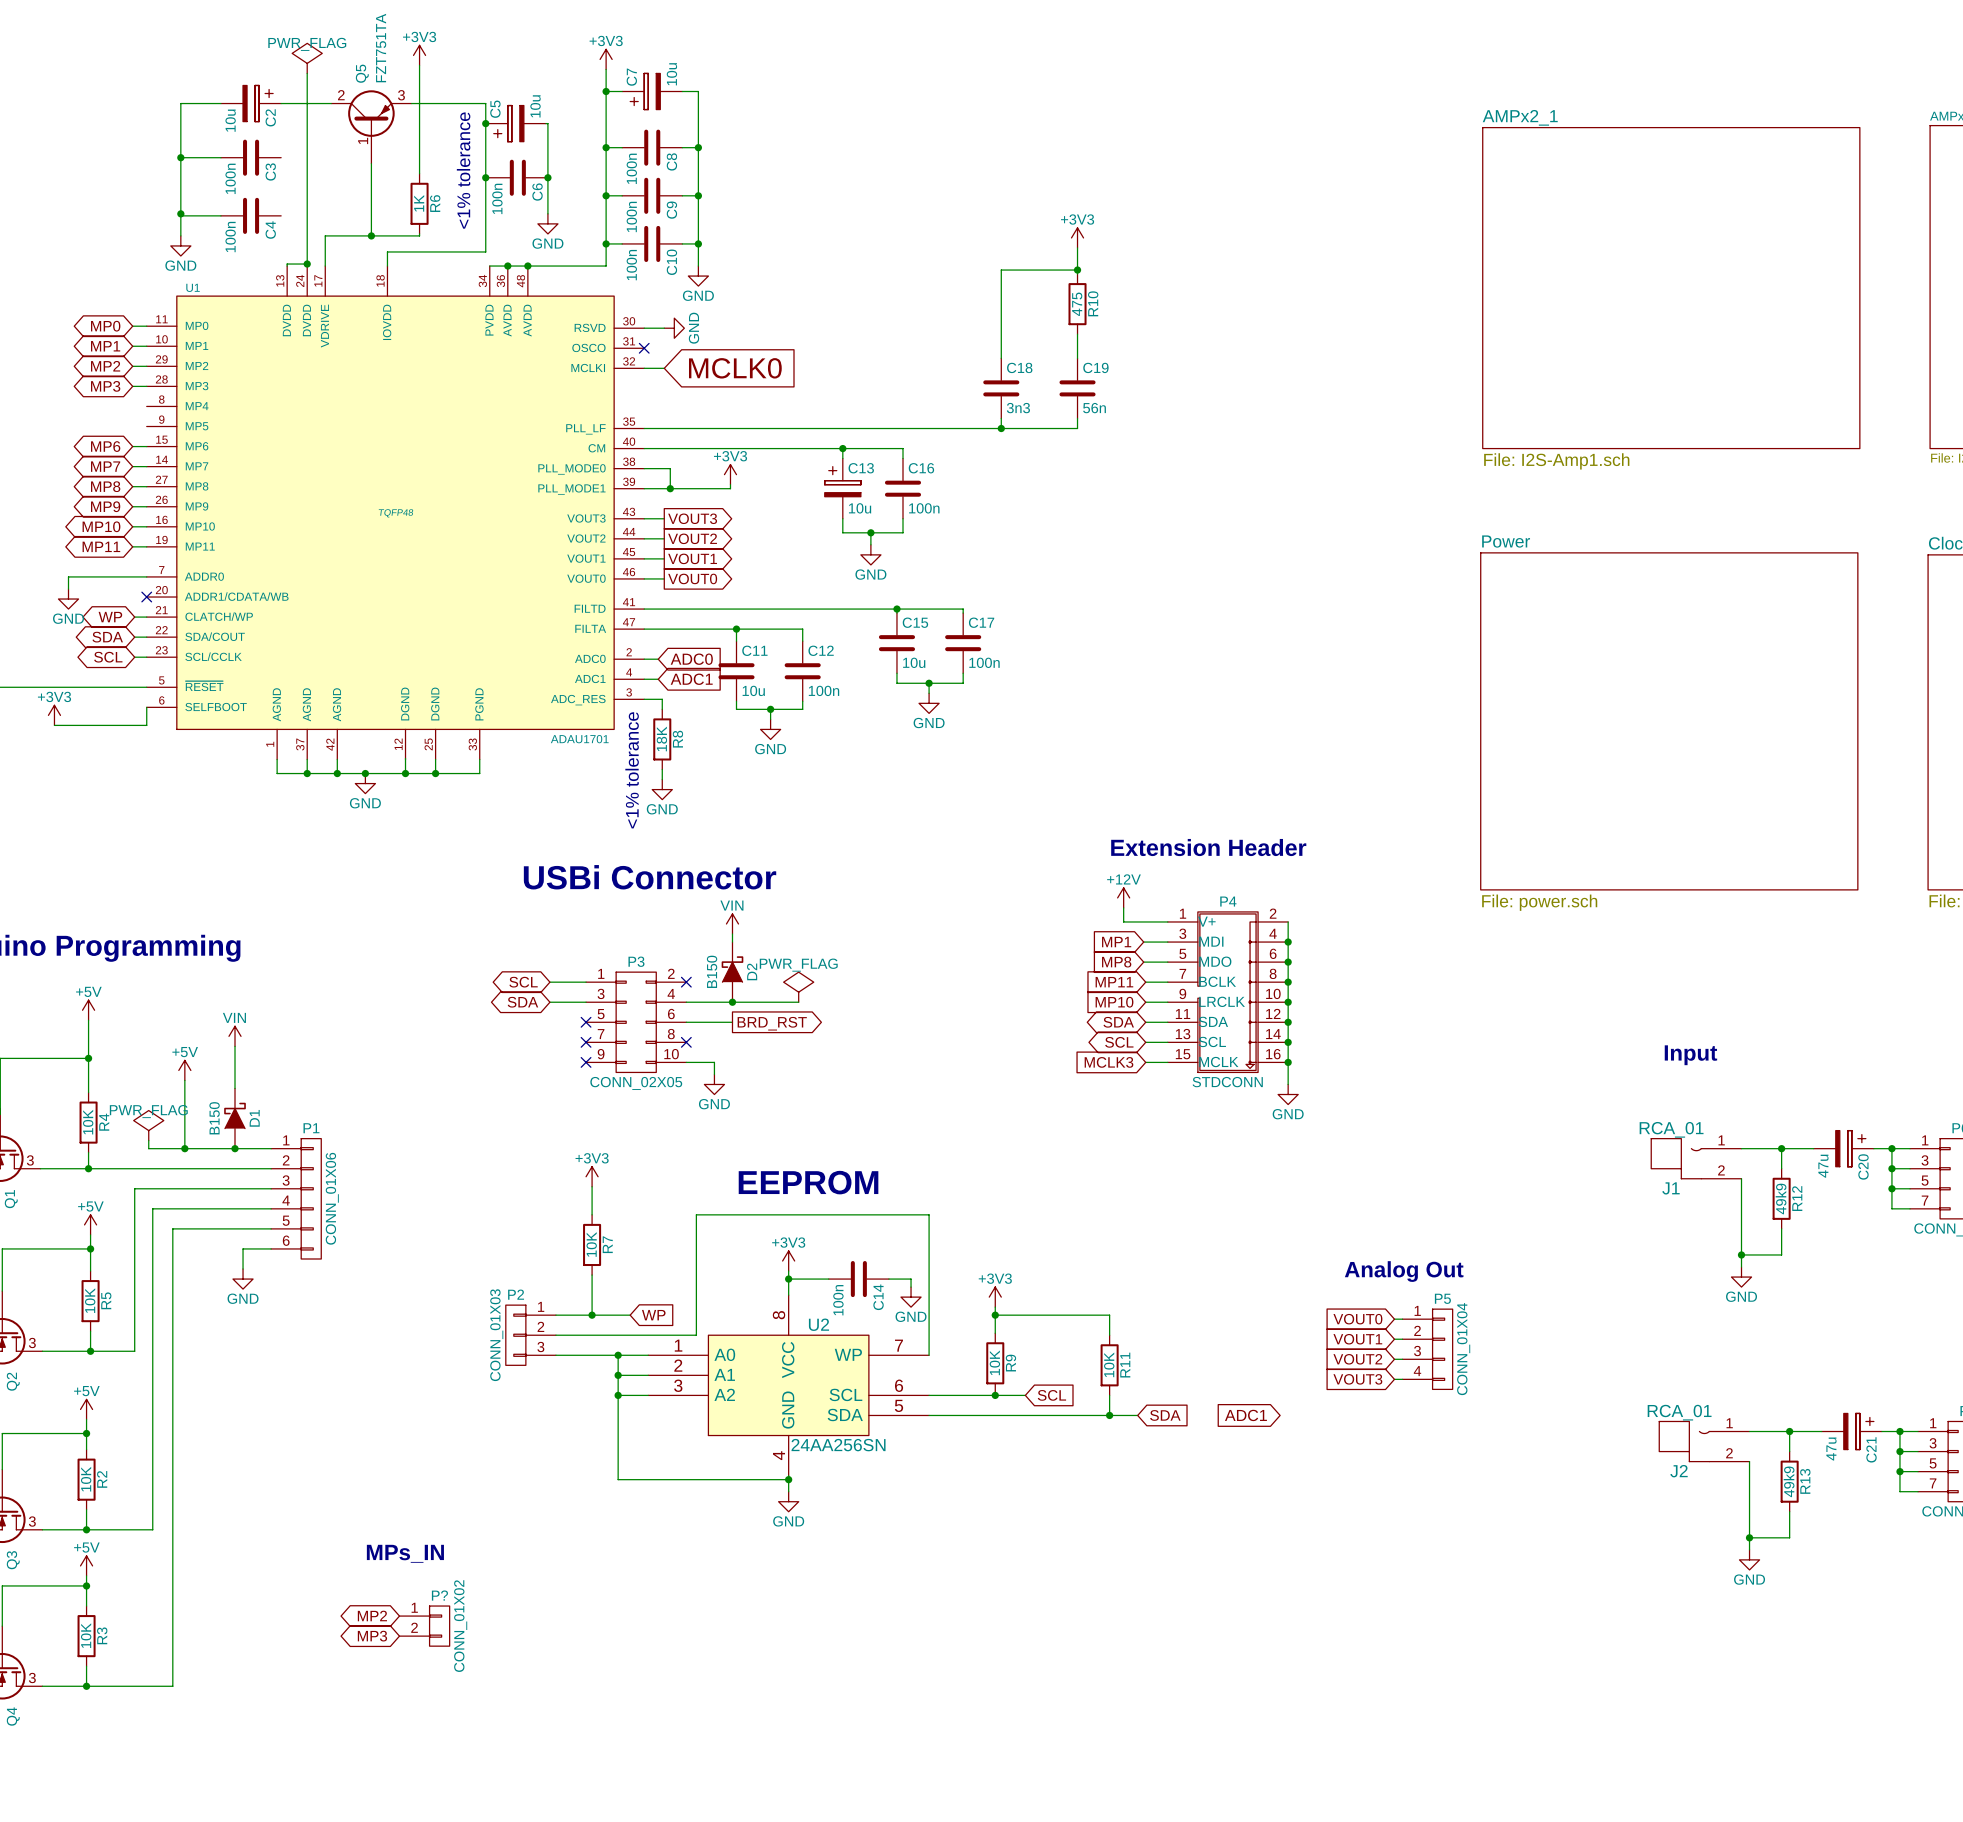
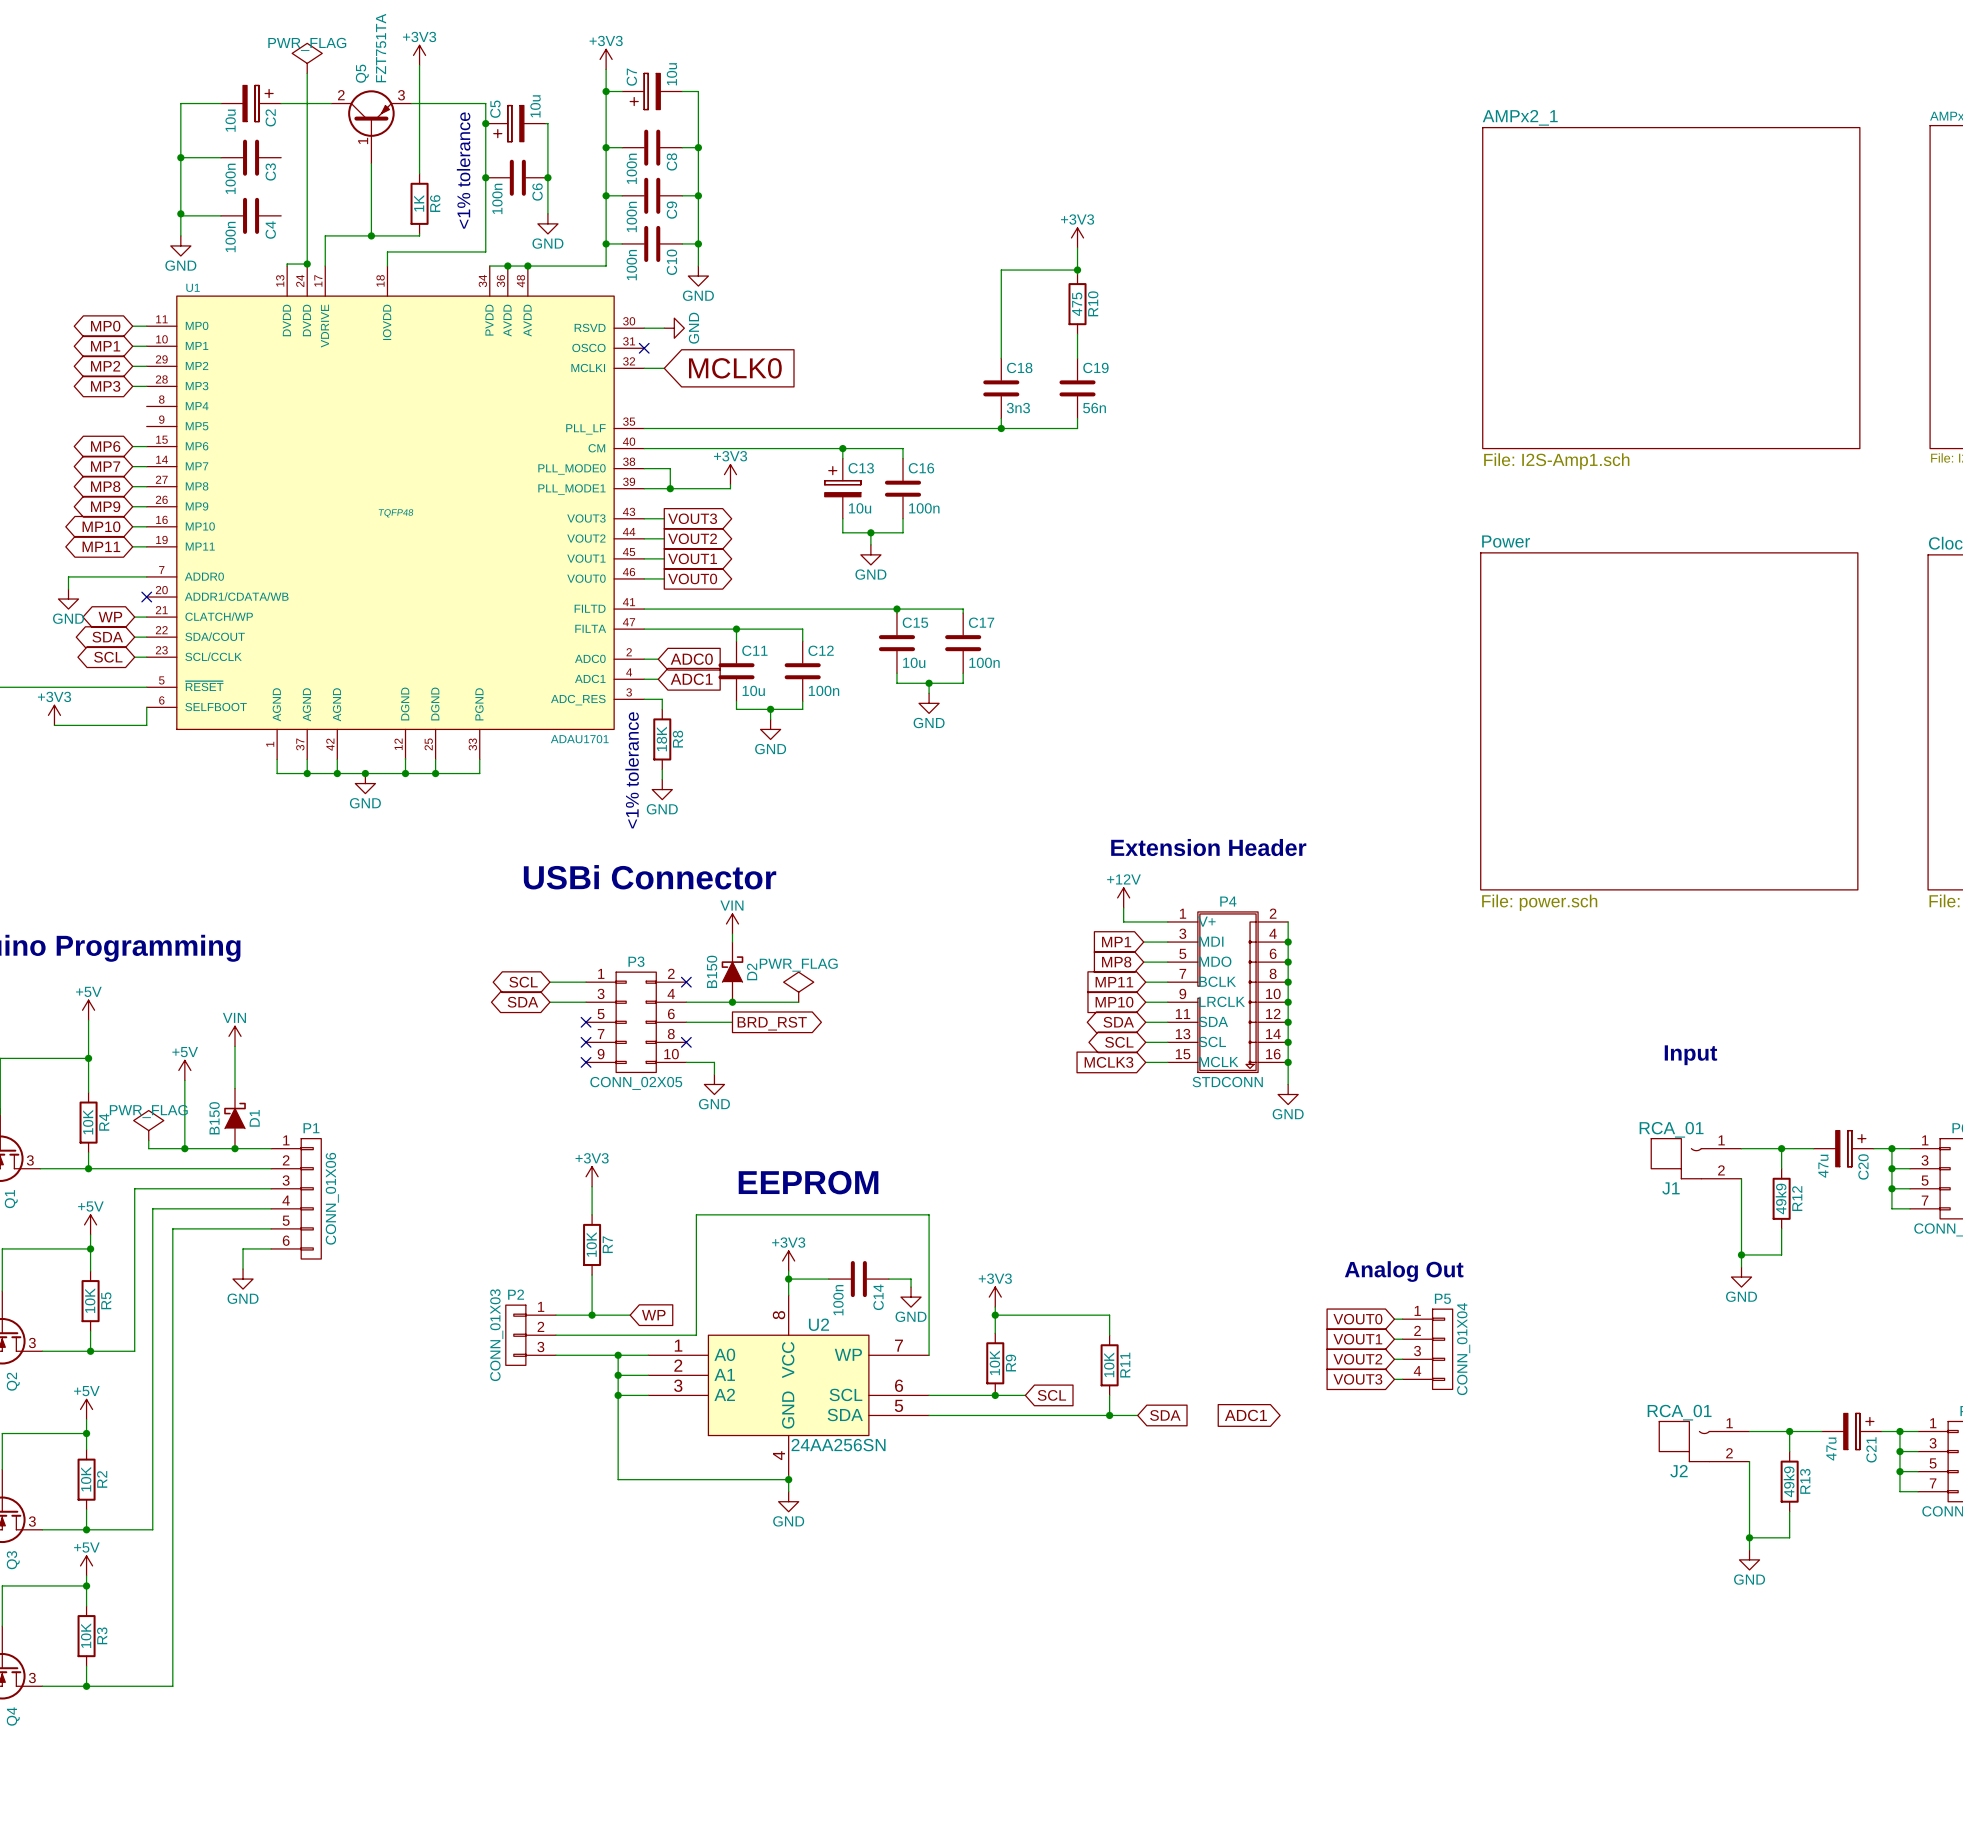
text: MPs_IN (405, 1553) -> none
global label: MP2 (372, 1615) -> none
P?: CONN_01X02 (424, 1626) -> none
global label: MP3 (372, 1636) -> none

